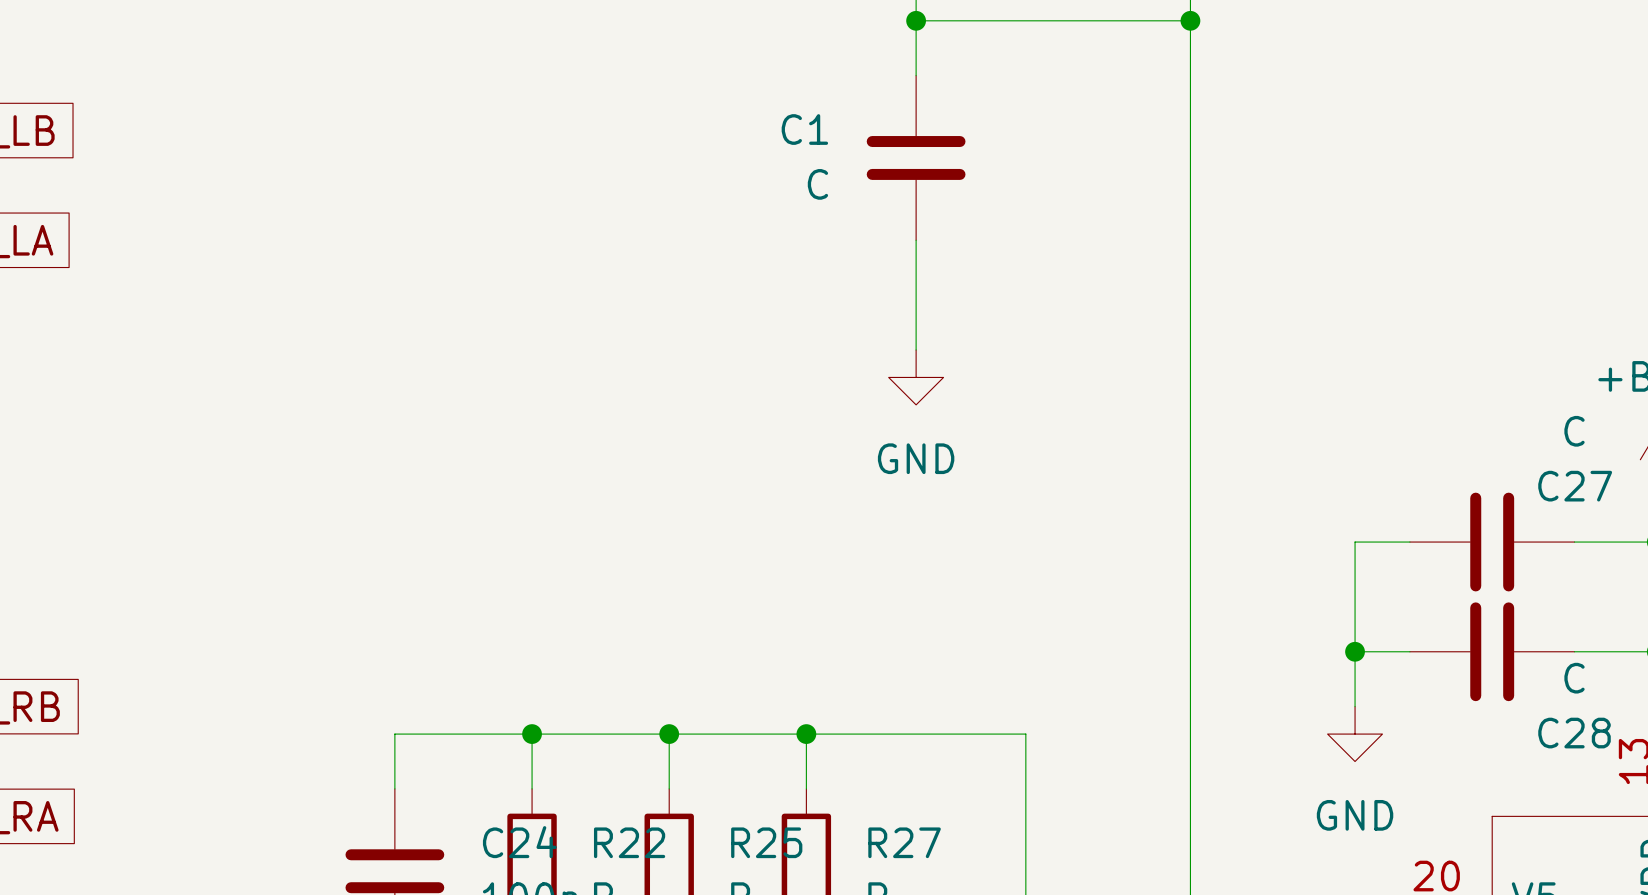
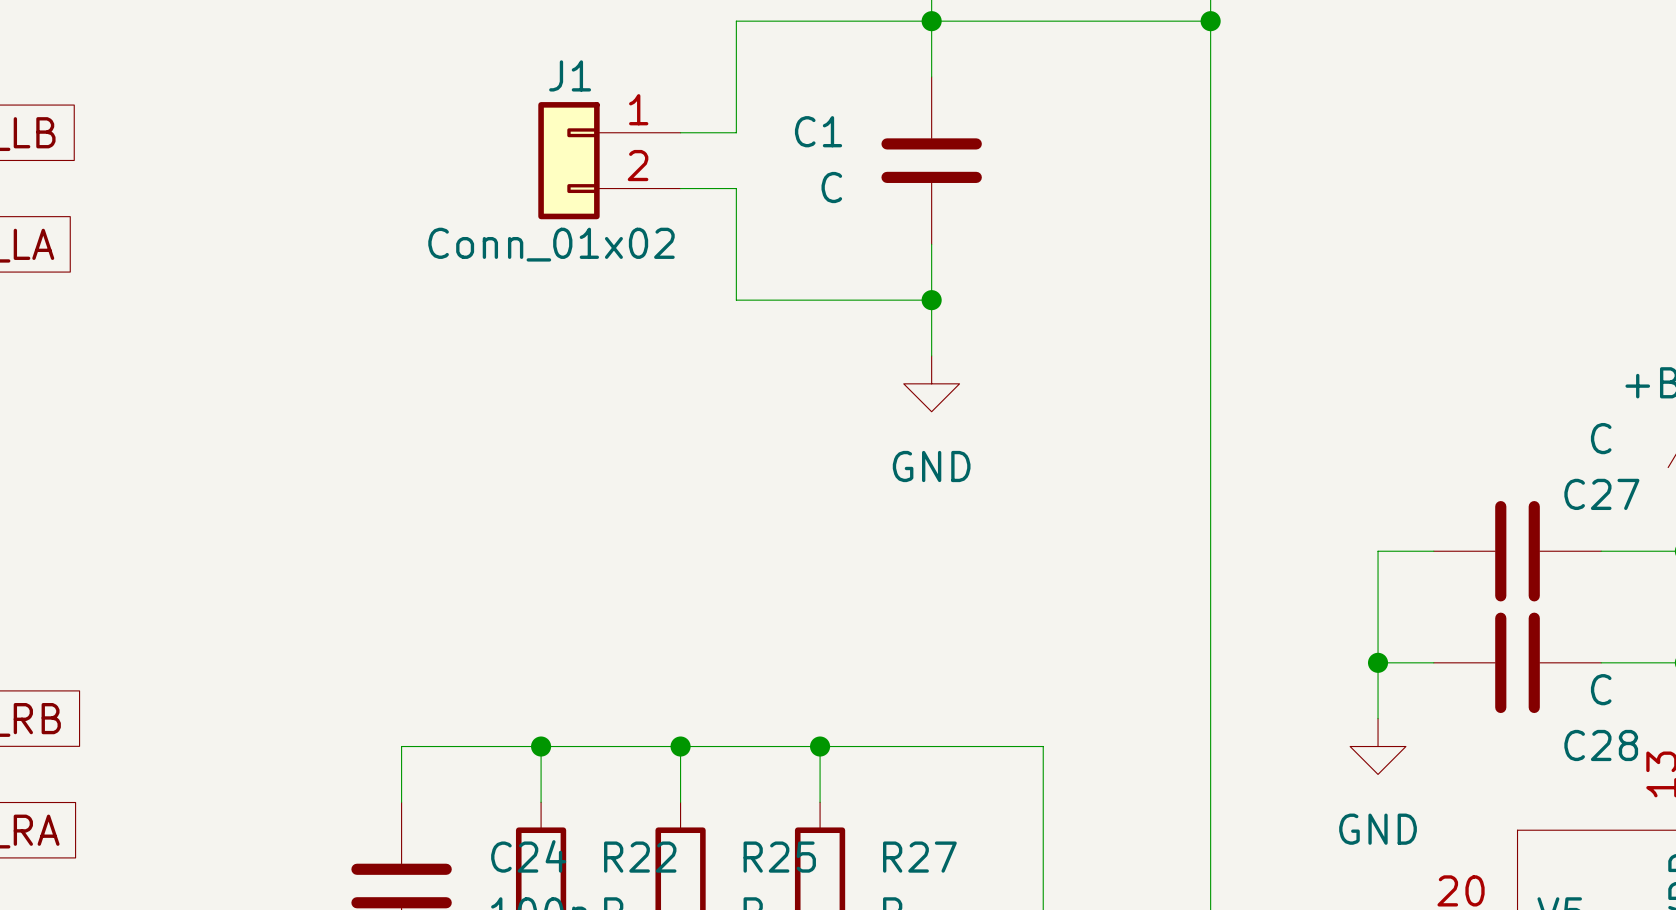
wire: none -> (931, 21) (736, 21) (736, 132) (680, 132)
J1: none -> Conn_01x02 (609, 160)
wire: none -> (680, 188) (736, 188) (736, 300) (931, 300)
junction: none -> (931, 300)

